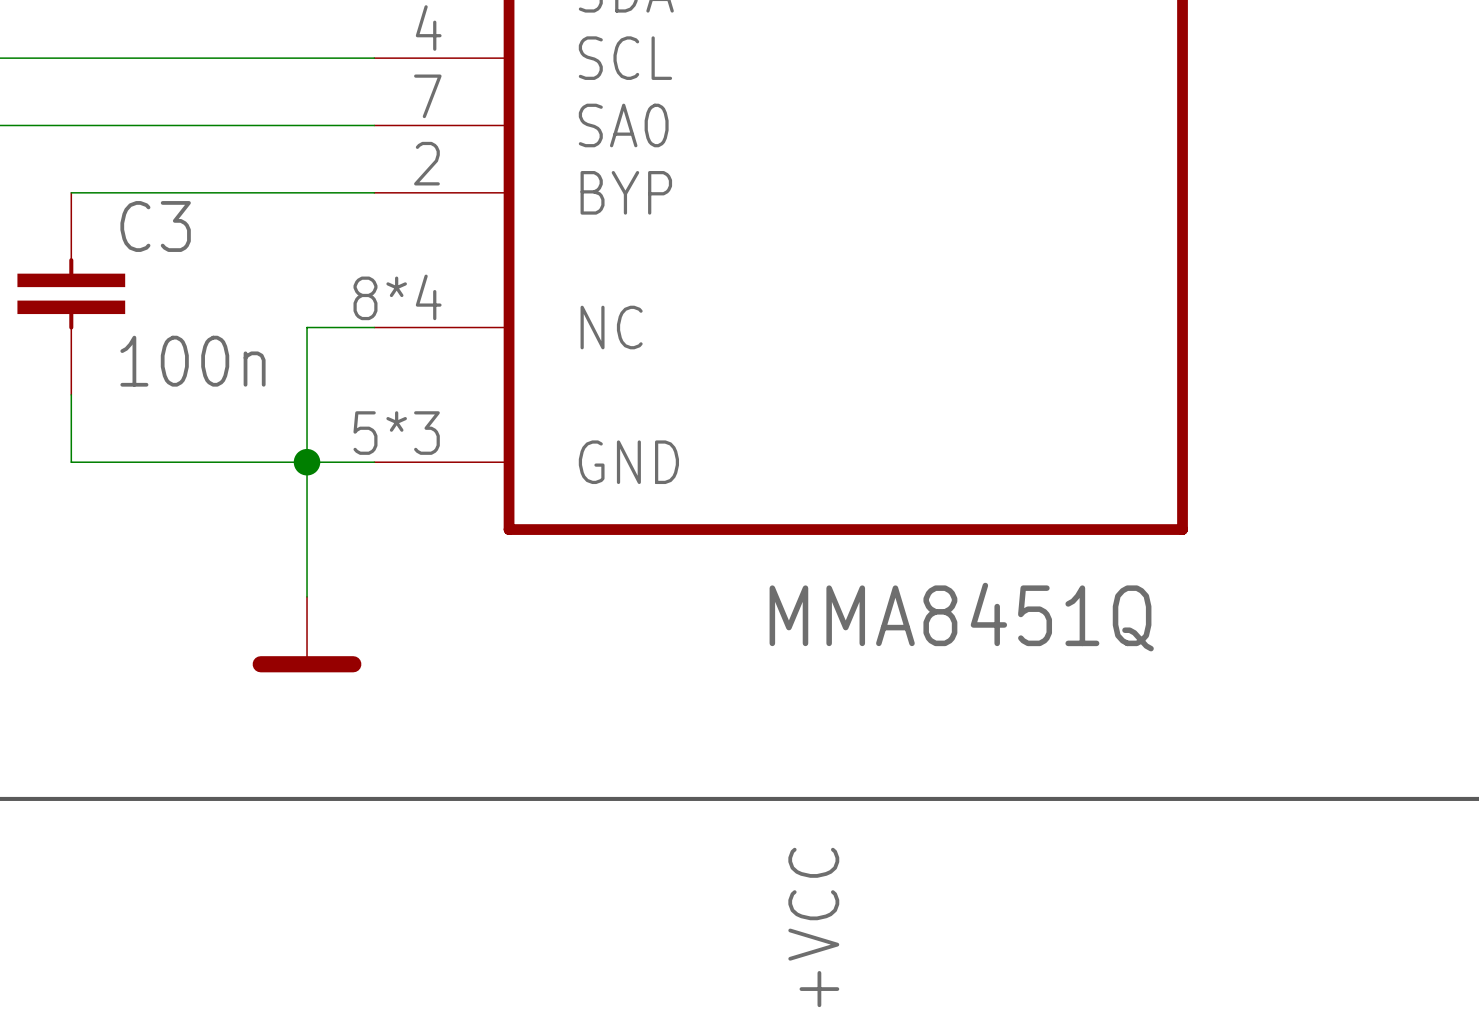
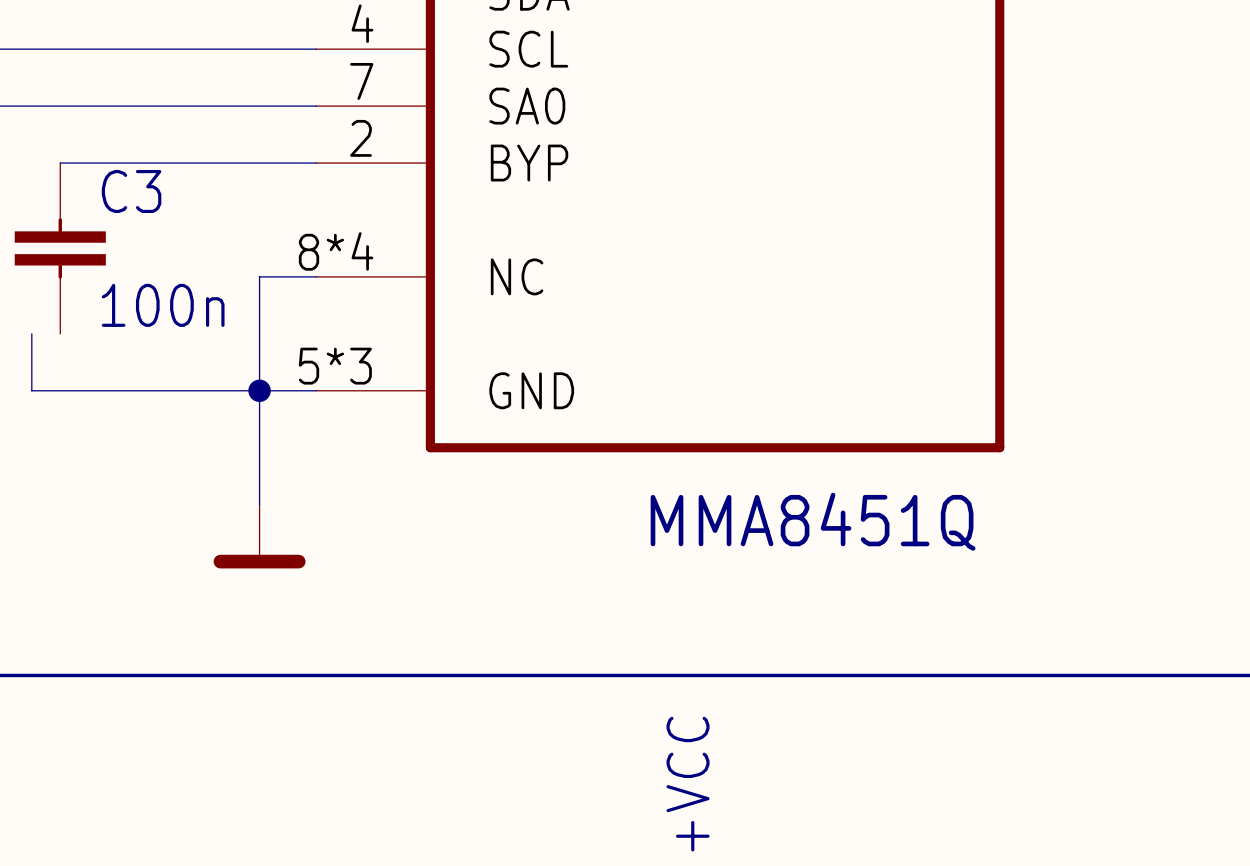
wire: (71, 394) (71, 462) -> (31, 333) (31, 390) (60, 390)

